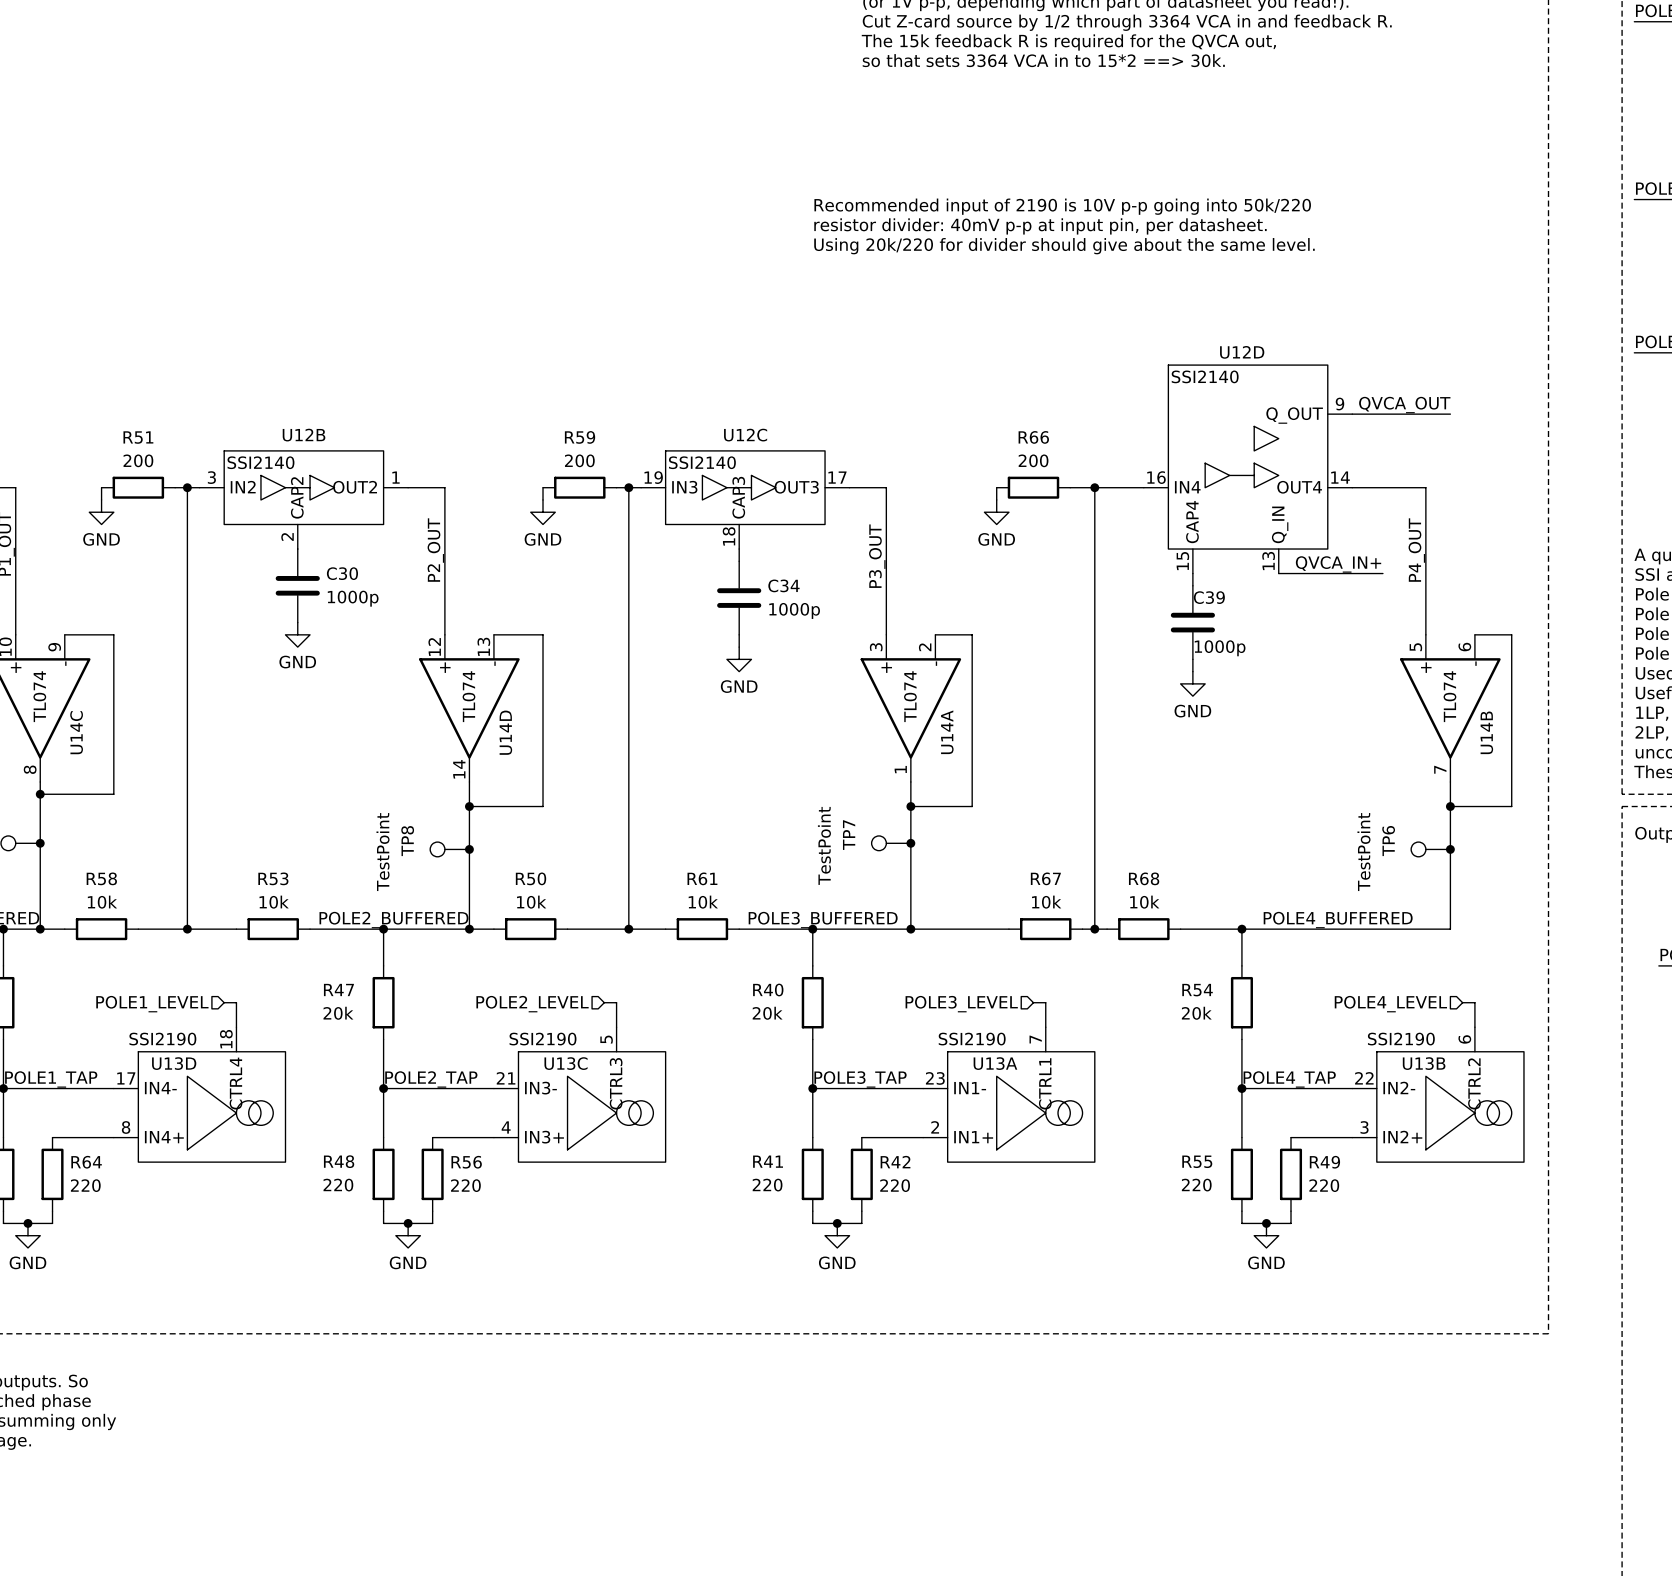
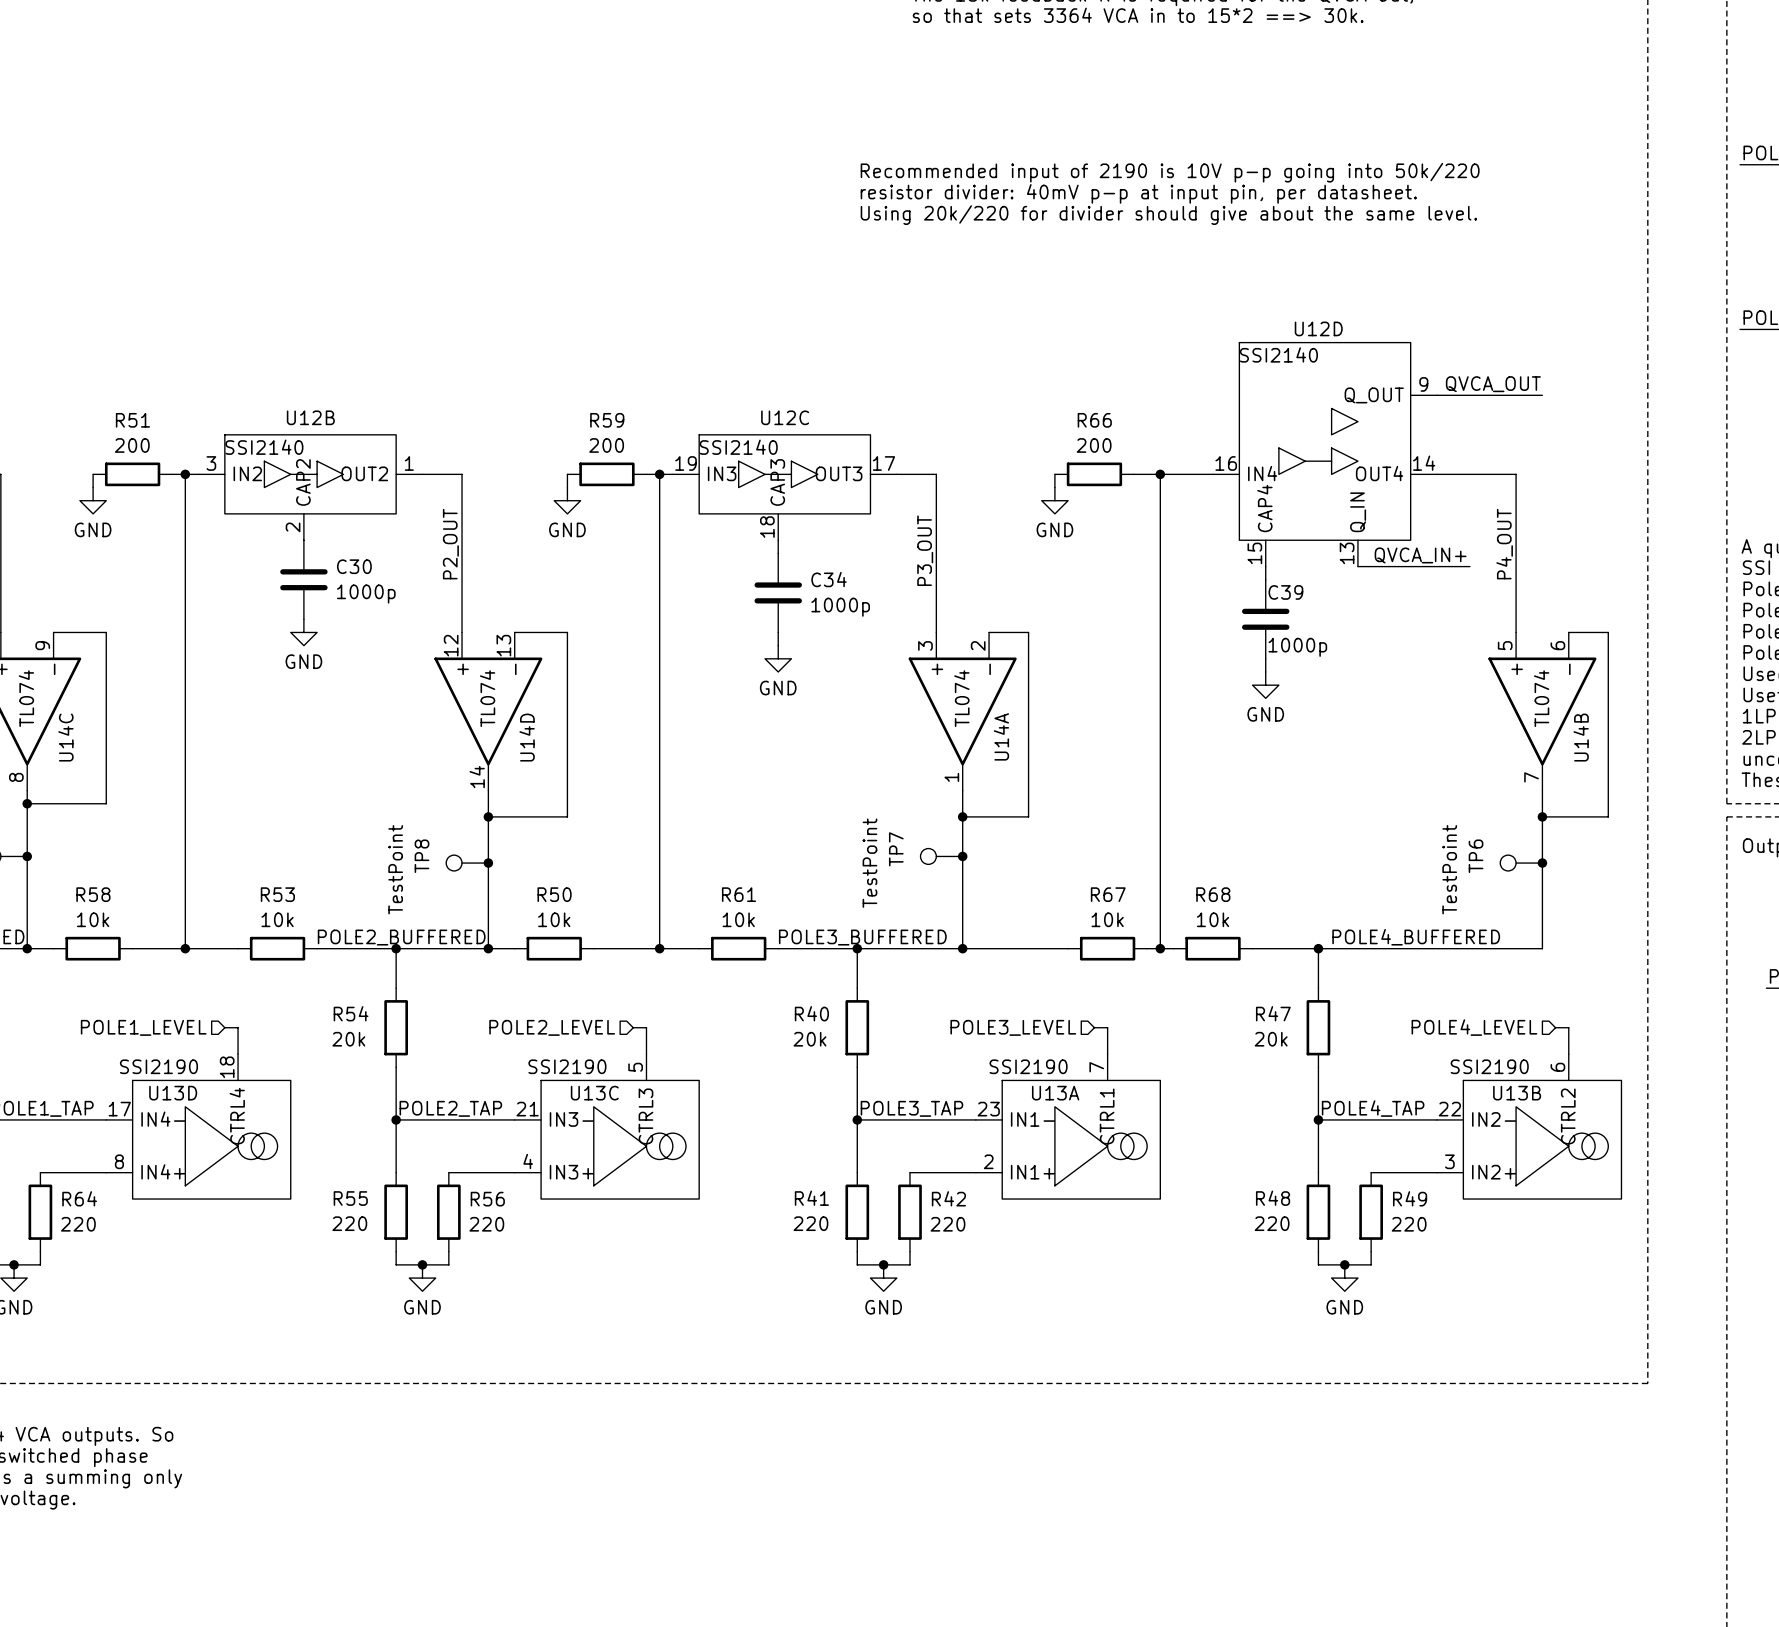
R47 name: R47 (338, 989) -> R54 (351, 1013)
R54 name: R54 (1197, 990) -> R47 (1273, 1013)
R48 name: R48 (339, 1161) -> R55 (350, 1198)
R55 name: R55 (1197, 1161) -> R48 (1273, 1198)

